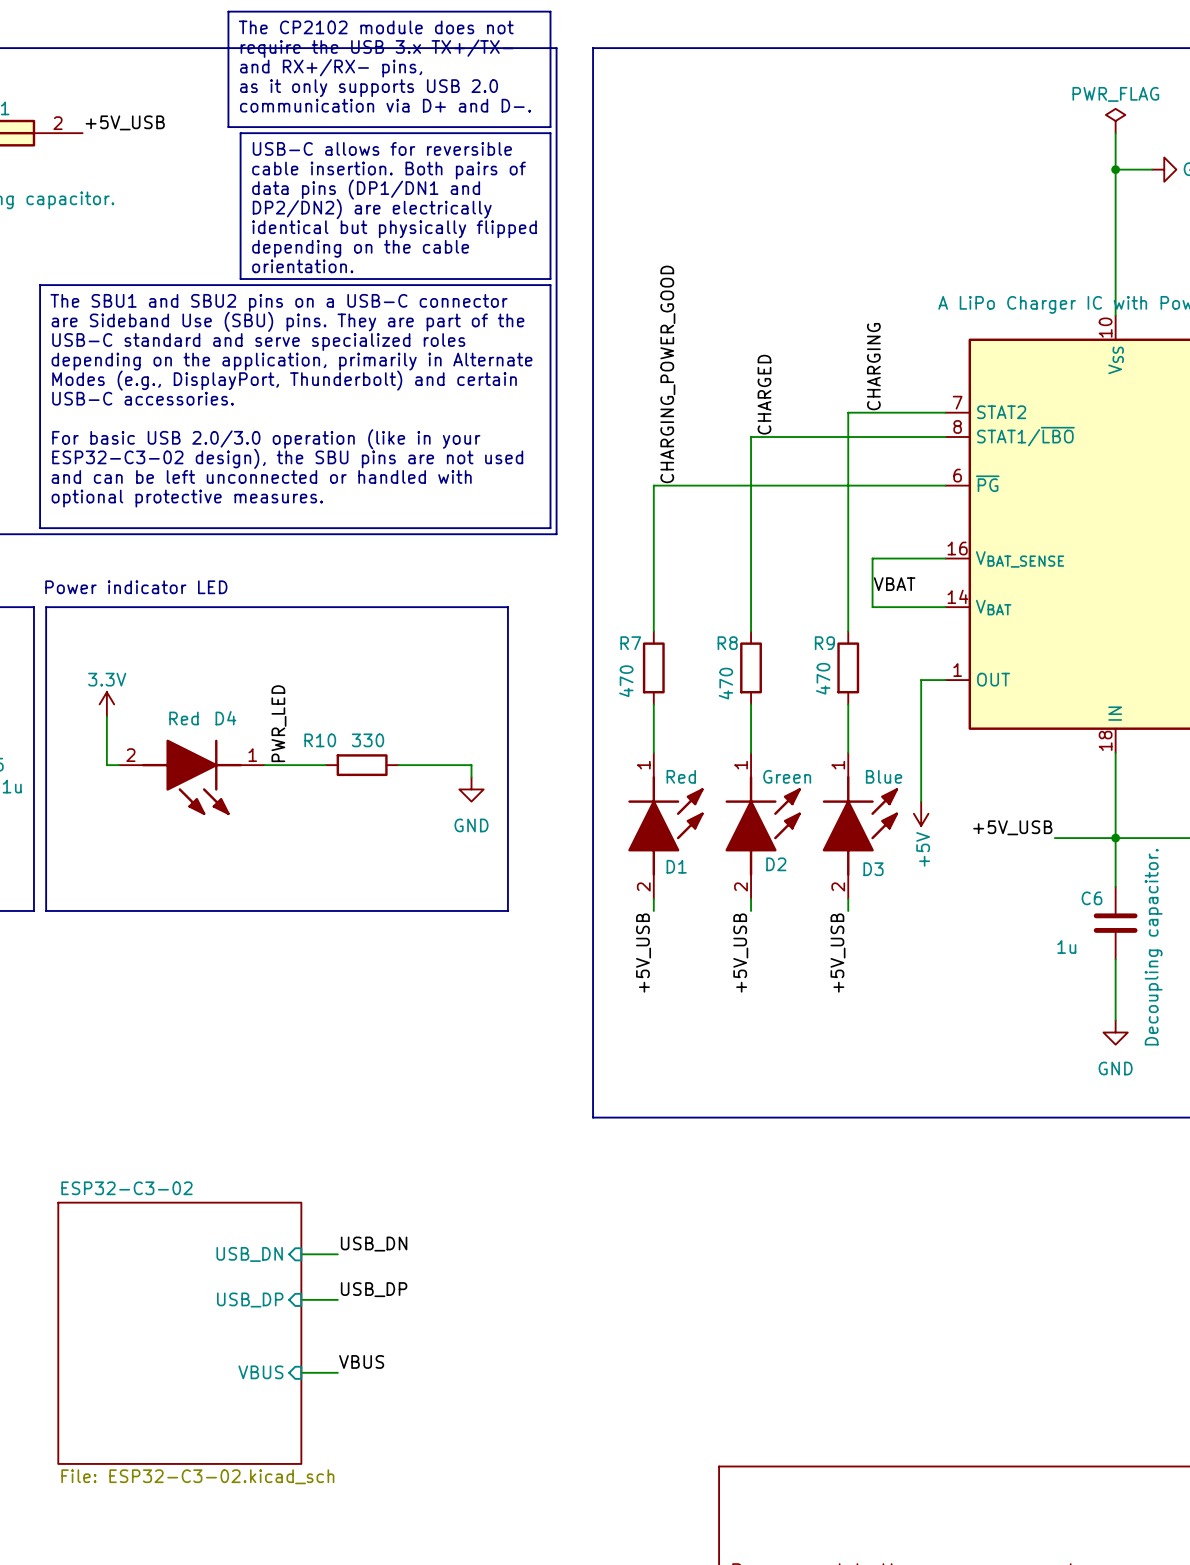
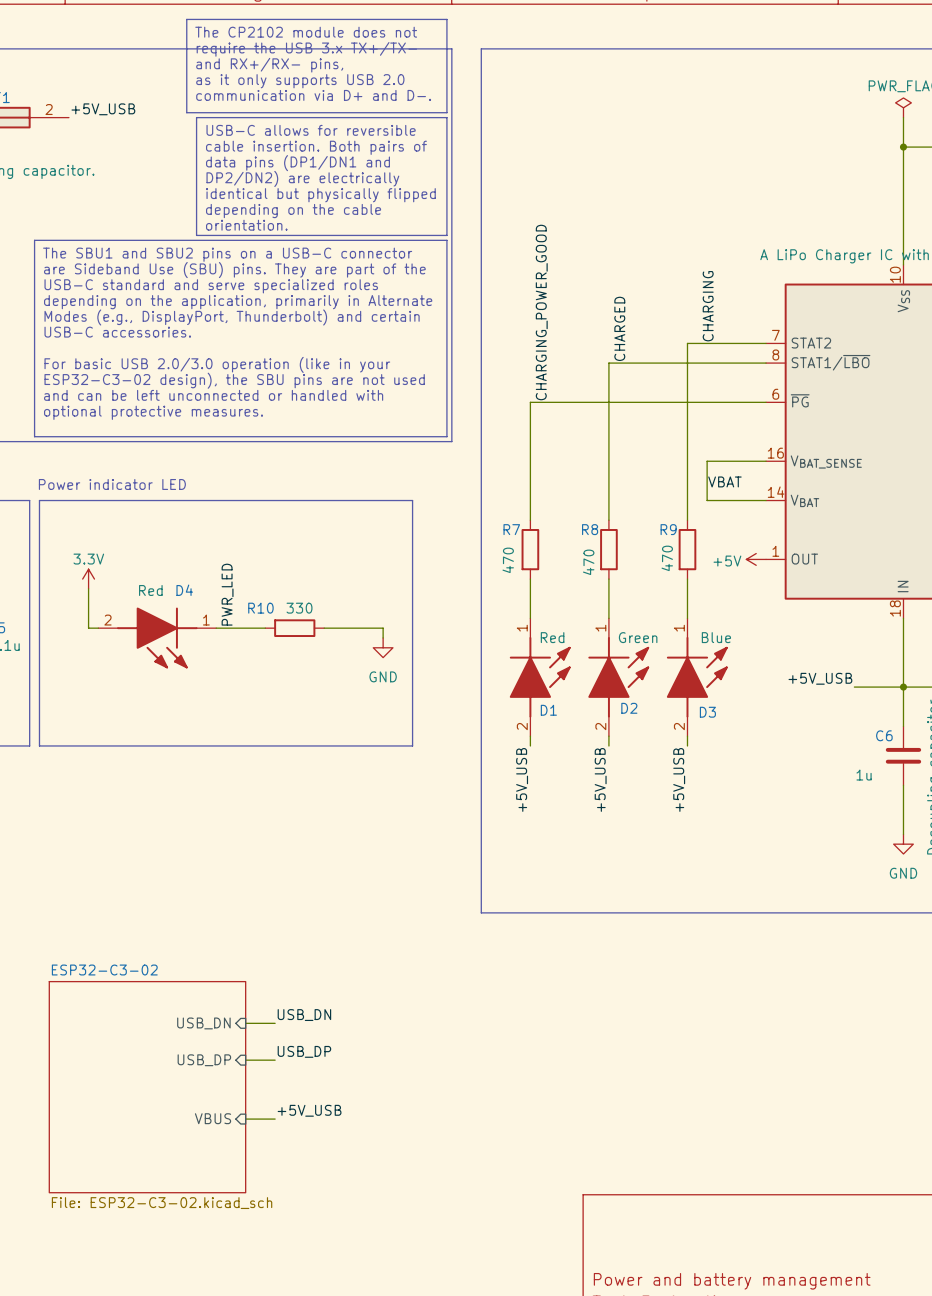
wire: (945, 680) (921, 680) (921, 801) -> none
power symbol rotation: 0° (921, 813) -> 90° clockwise (756, 559)
power symbol position: +5V (921, 813) -> +5V (756, 559)
label: VBUS (361, 1361) -> +5V_USB (309, 1110)

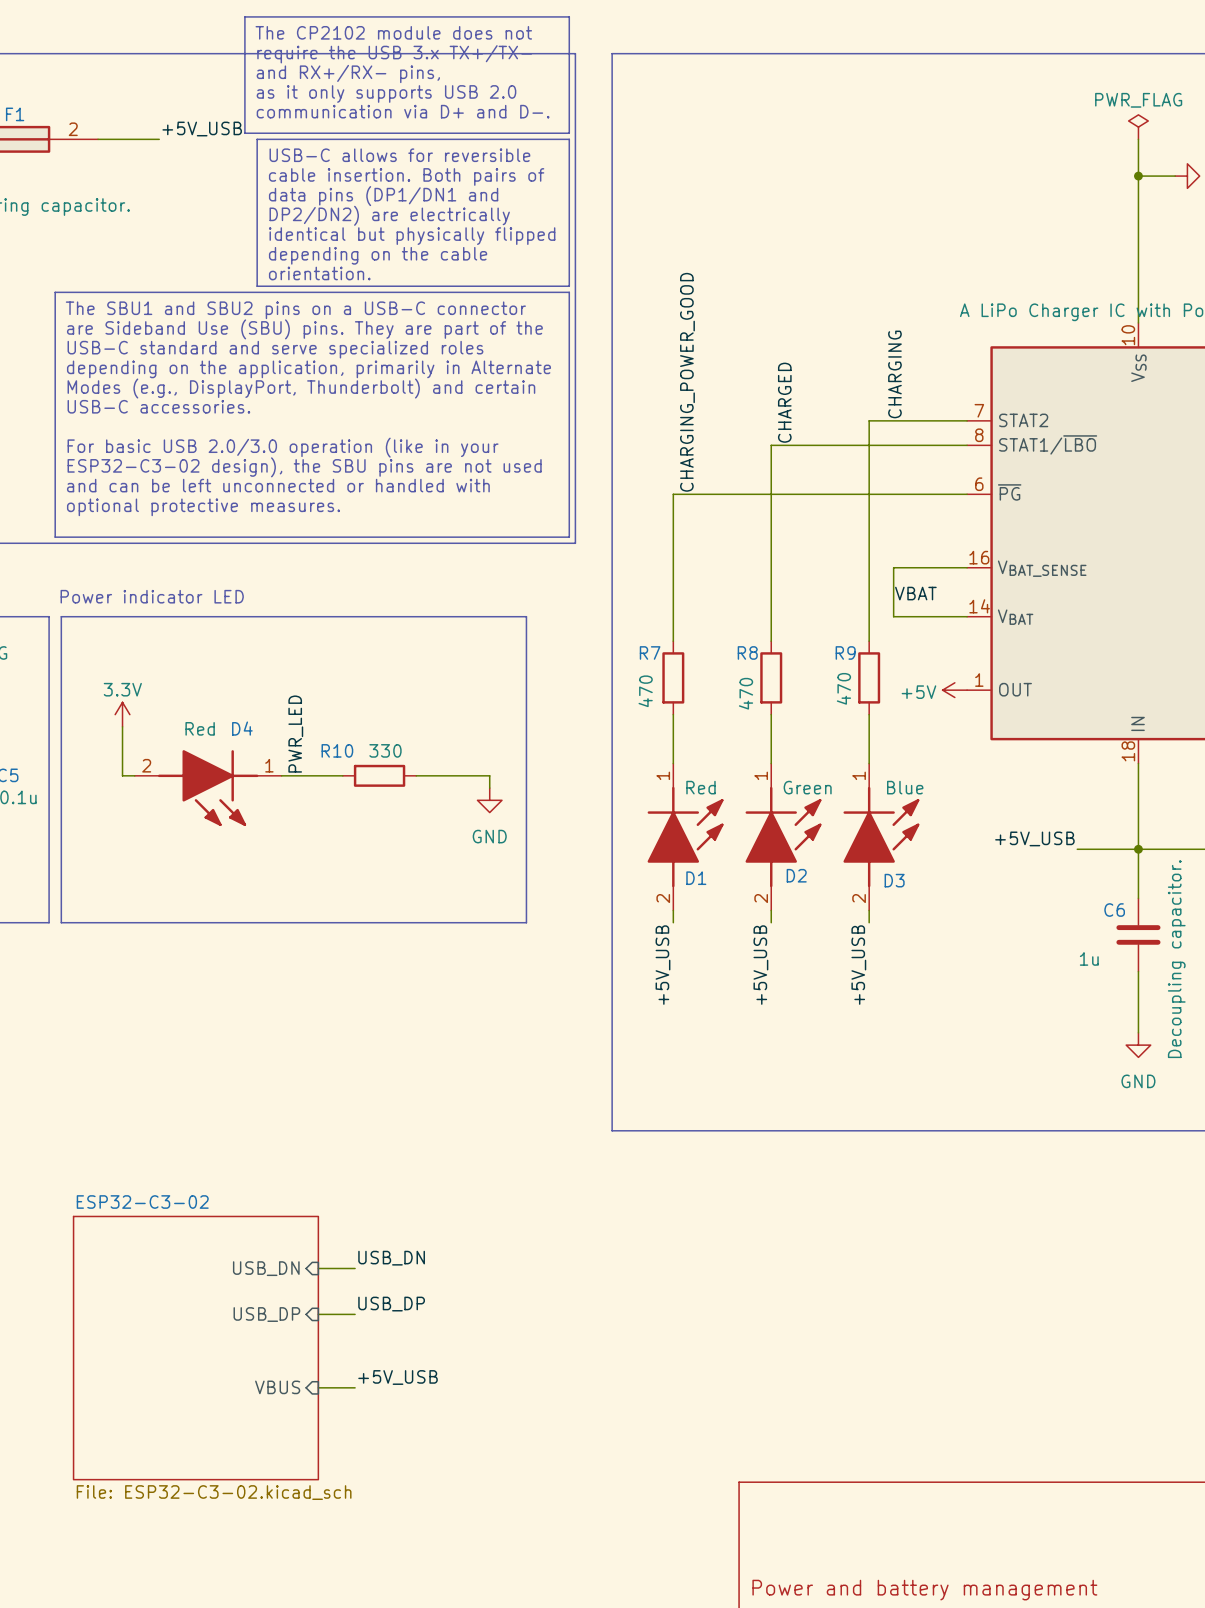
label position: +5V_USB (103, 109) -> +5V_USB (202, 129)
wire: none -> (98, 139) (159, 139)

